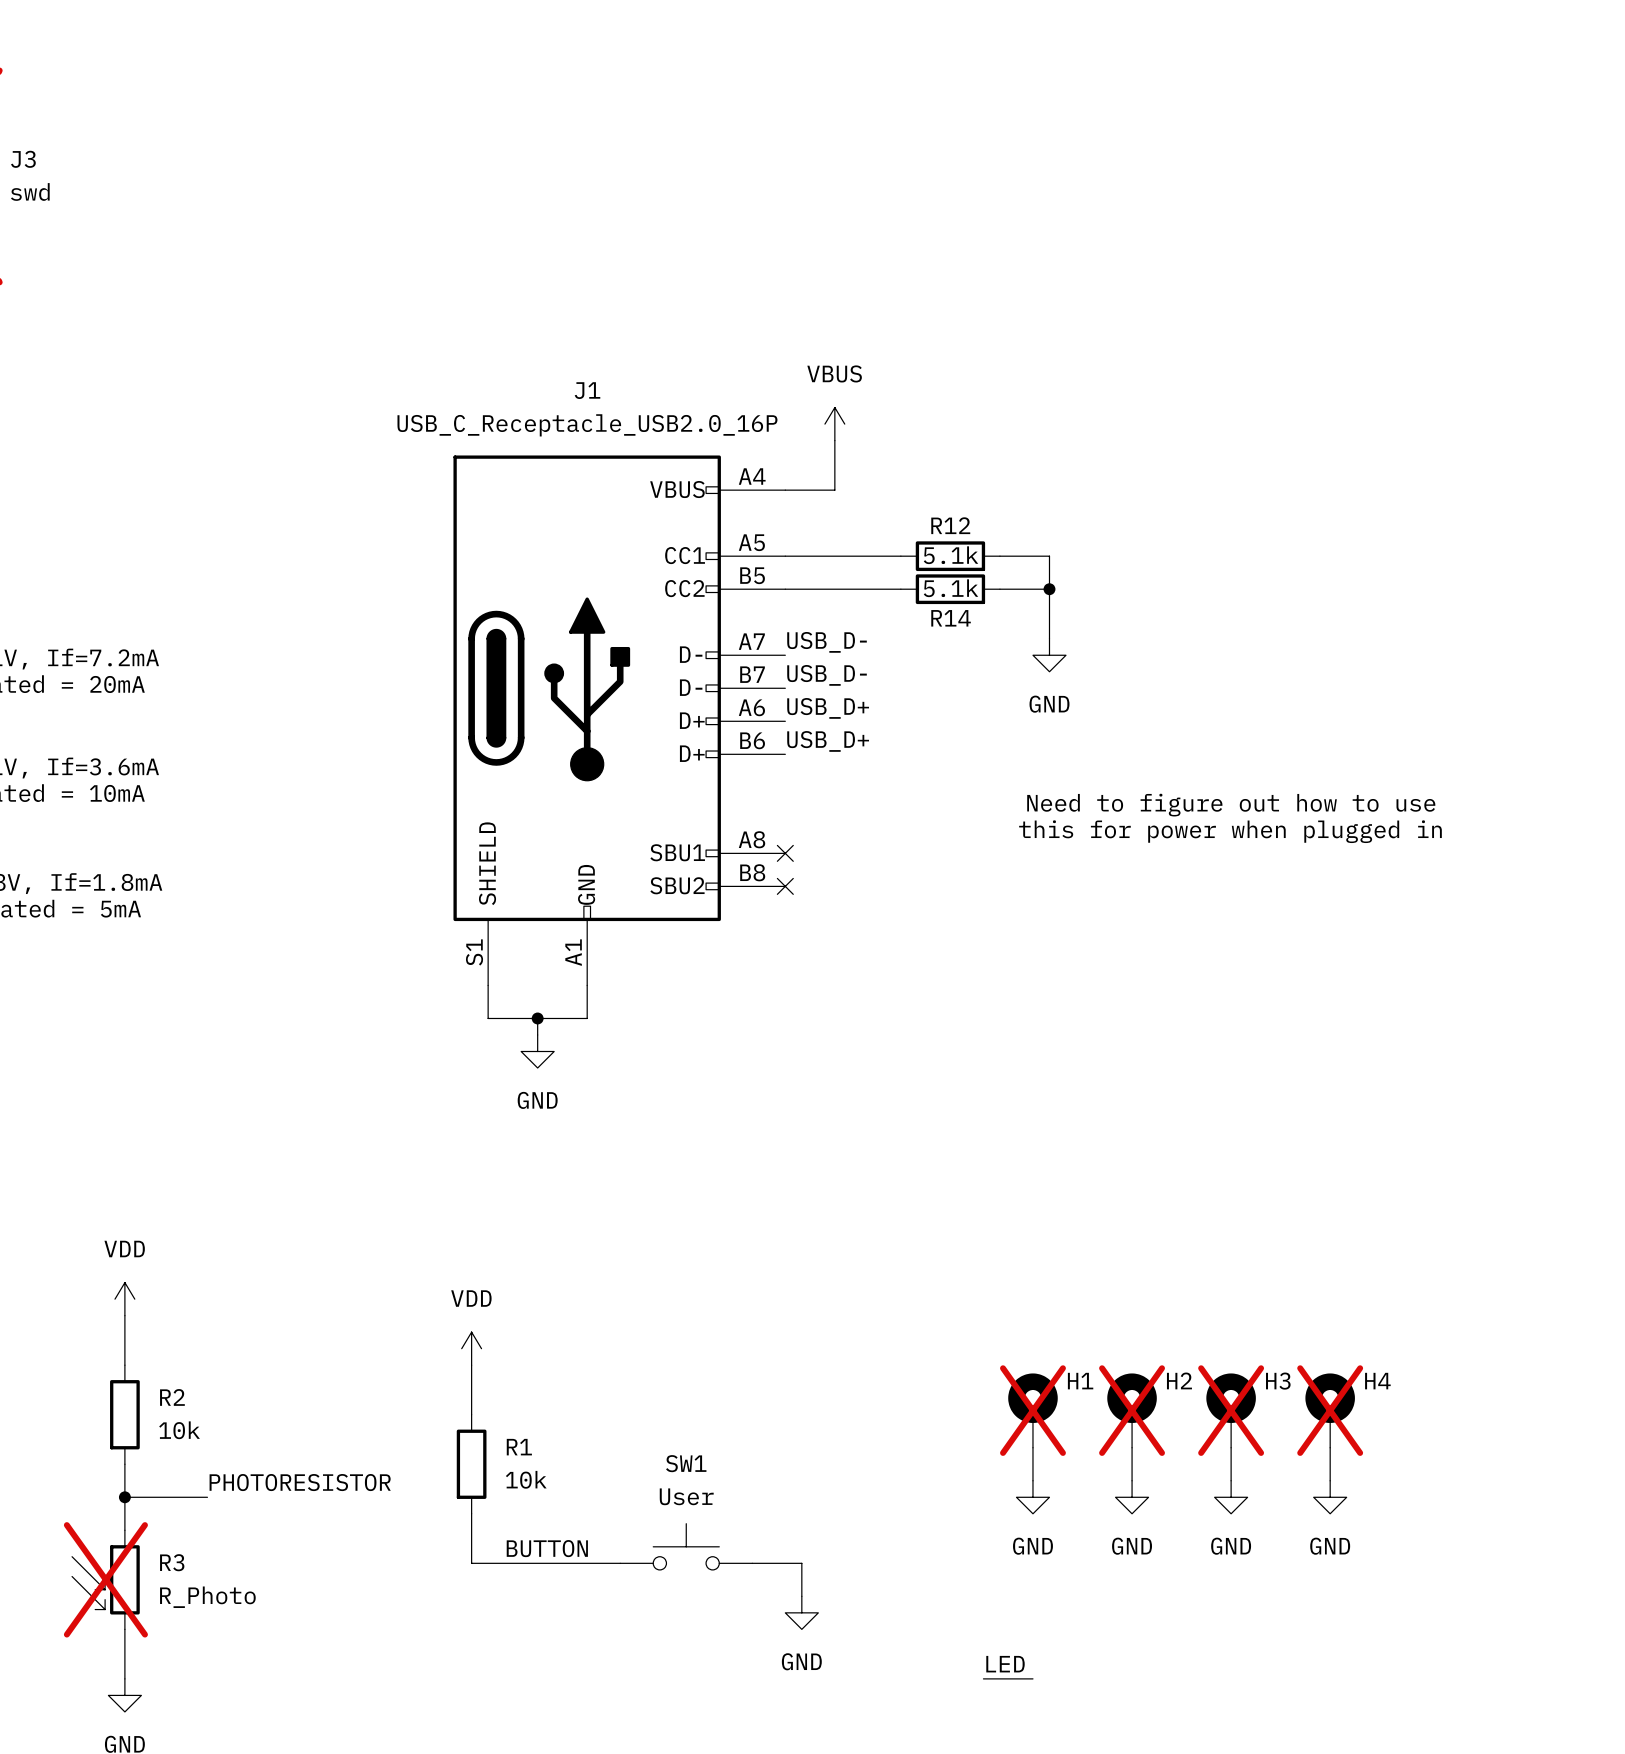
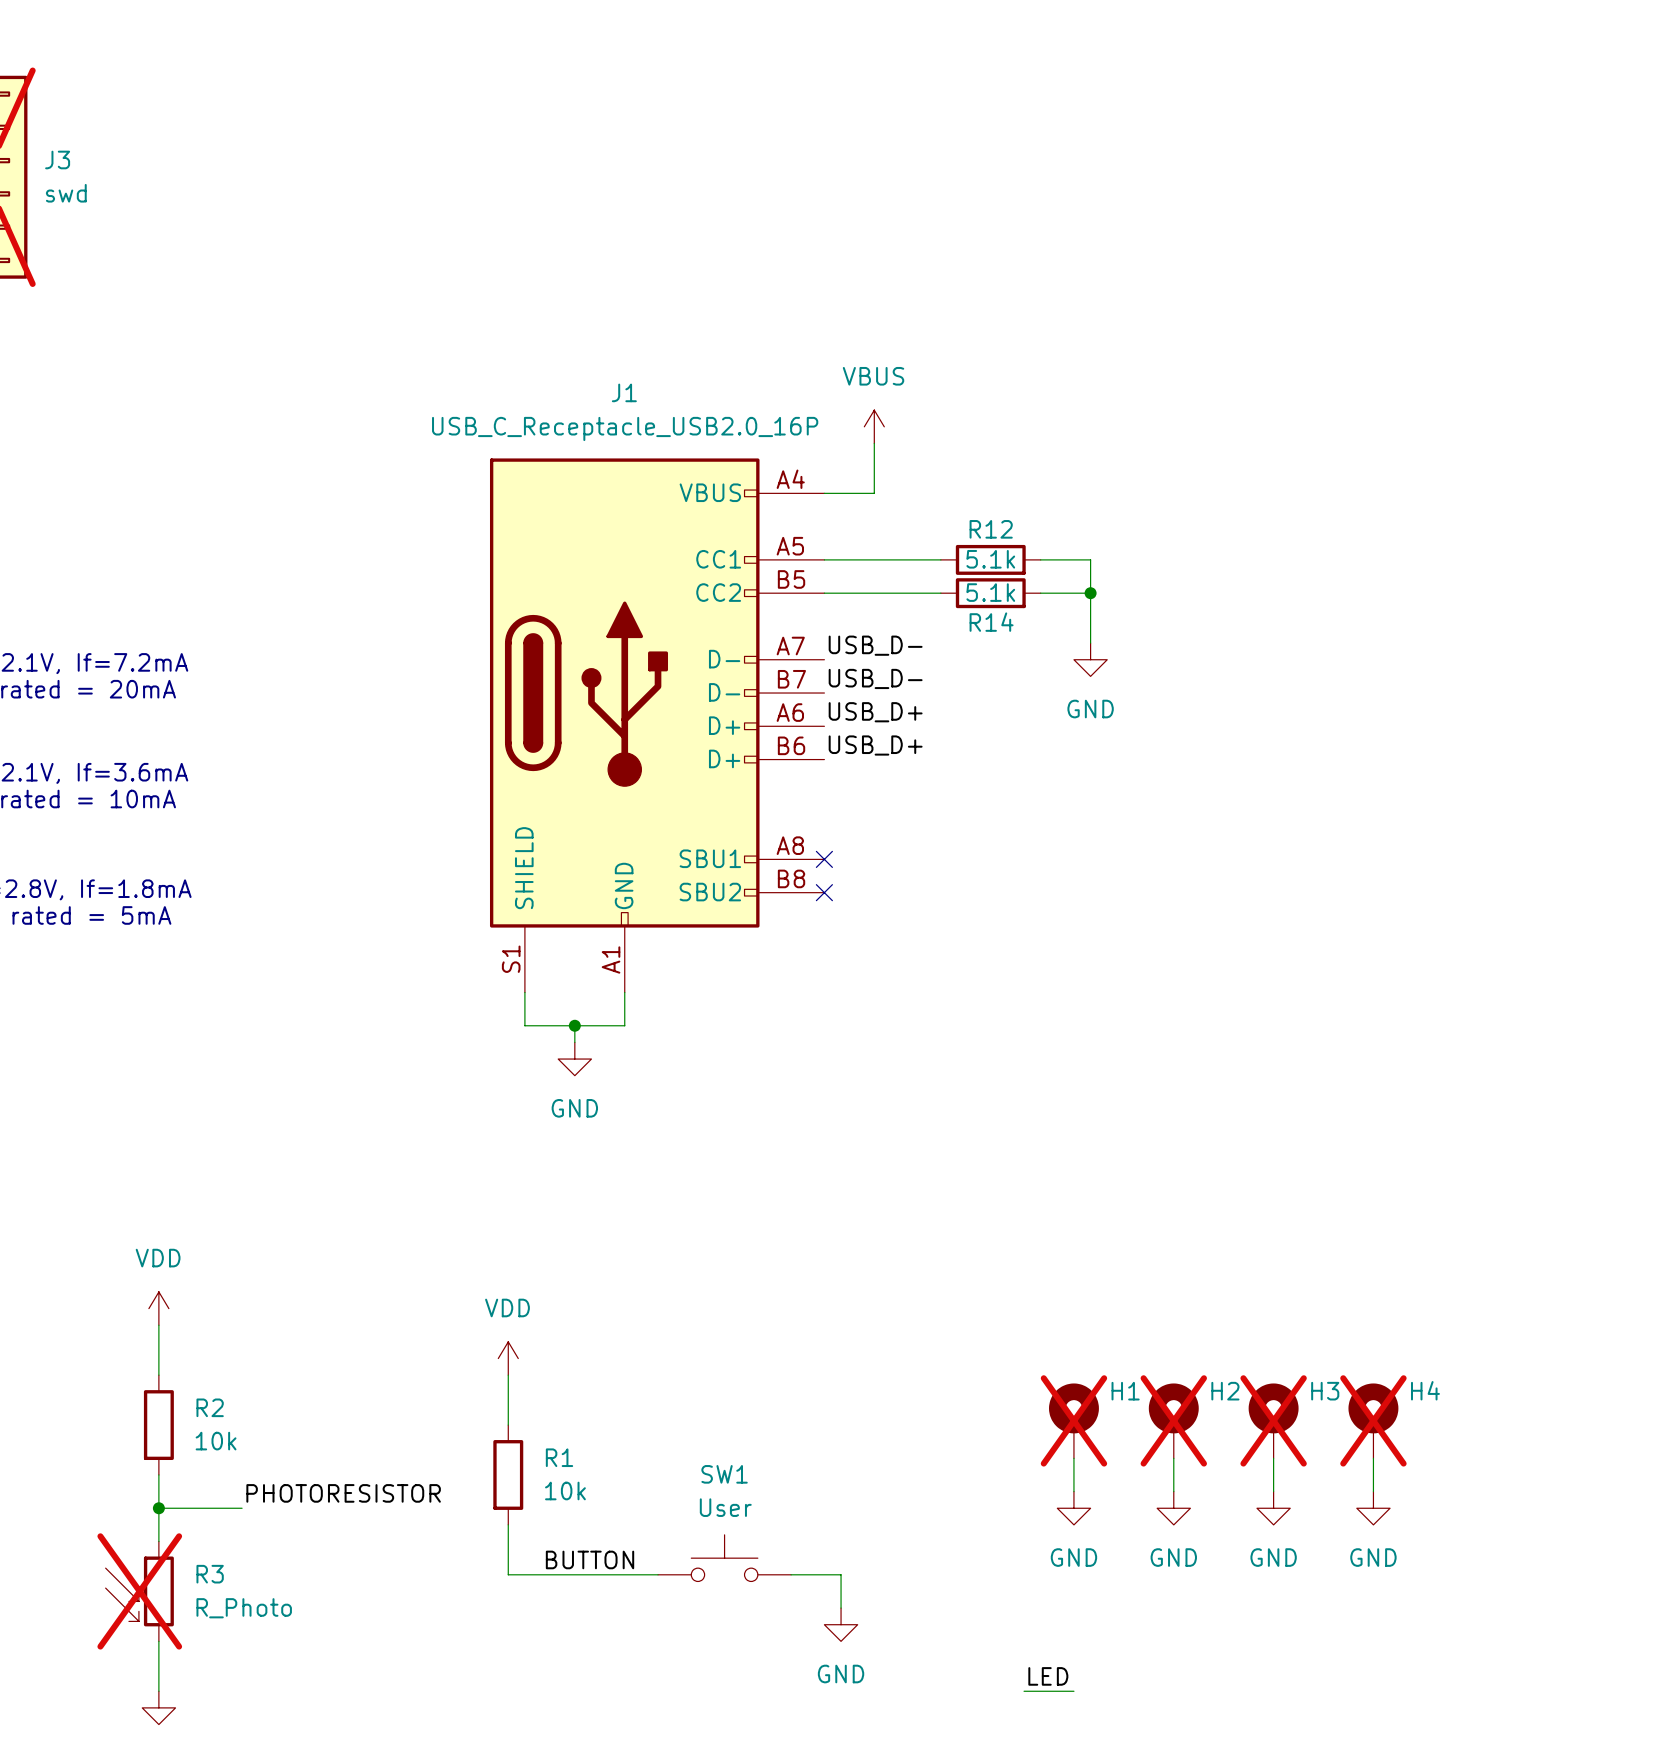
text: Need to figure out how to use (1231, 805) -> none
text: this for power when plugged in (1230, 831) -> none

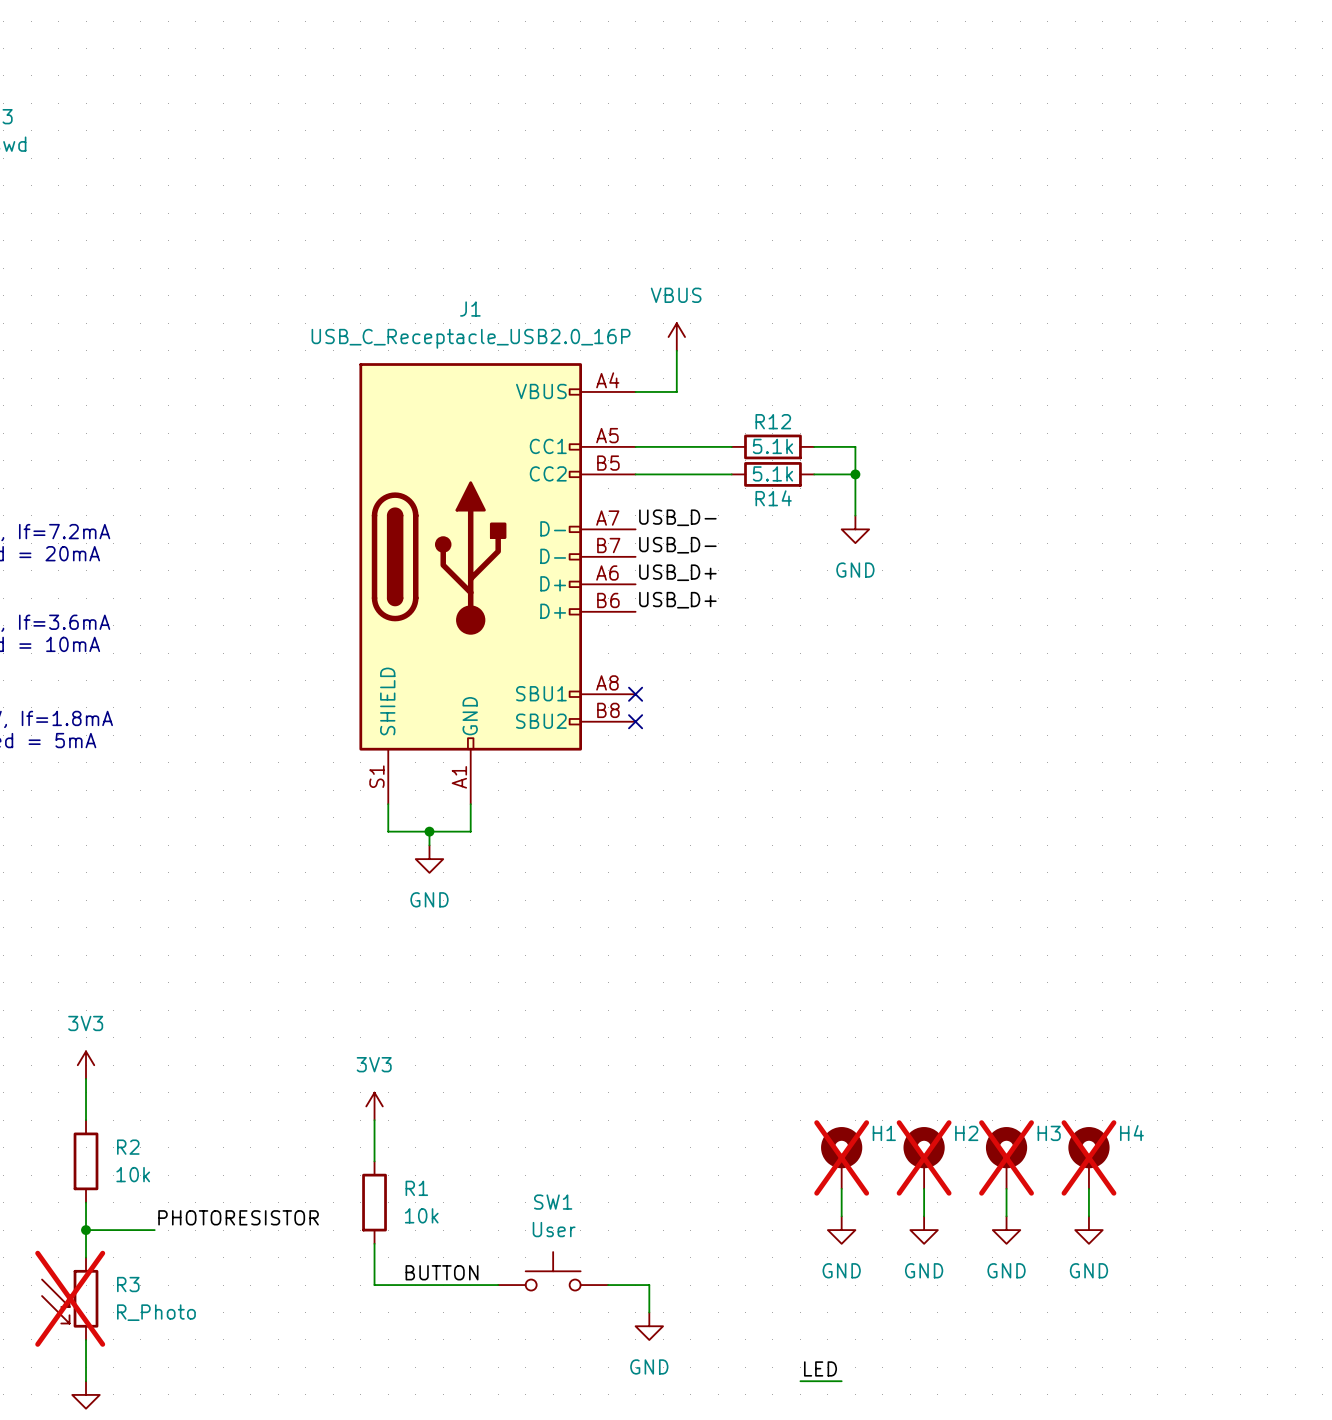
power symbol: VDD (158, 1308) -> 3V3 (86, 1065)
power symbol: VDD (508, 1358) -> 3V3 (374, 1106)

